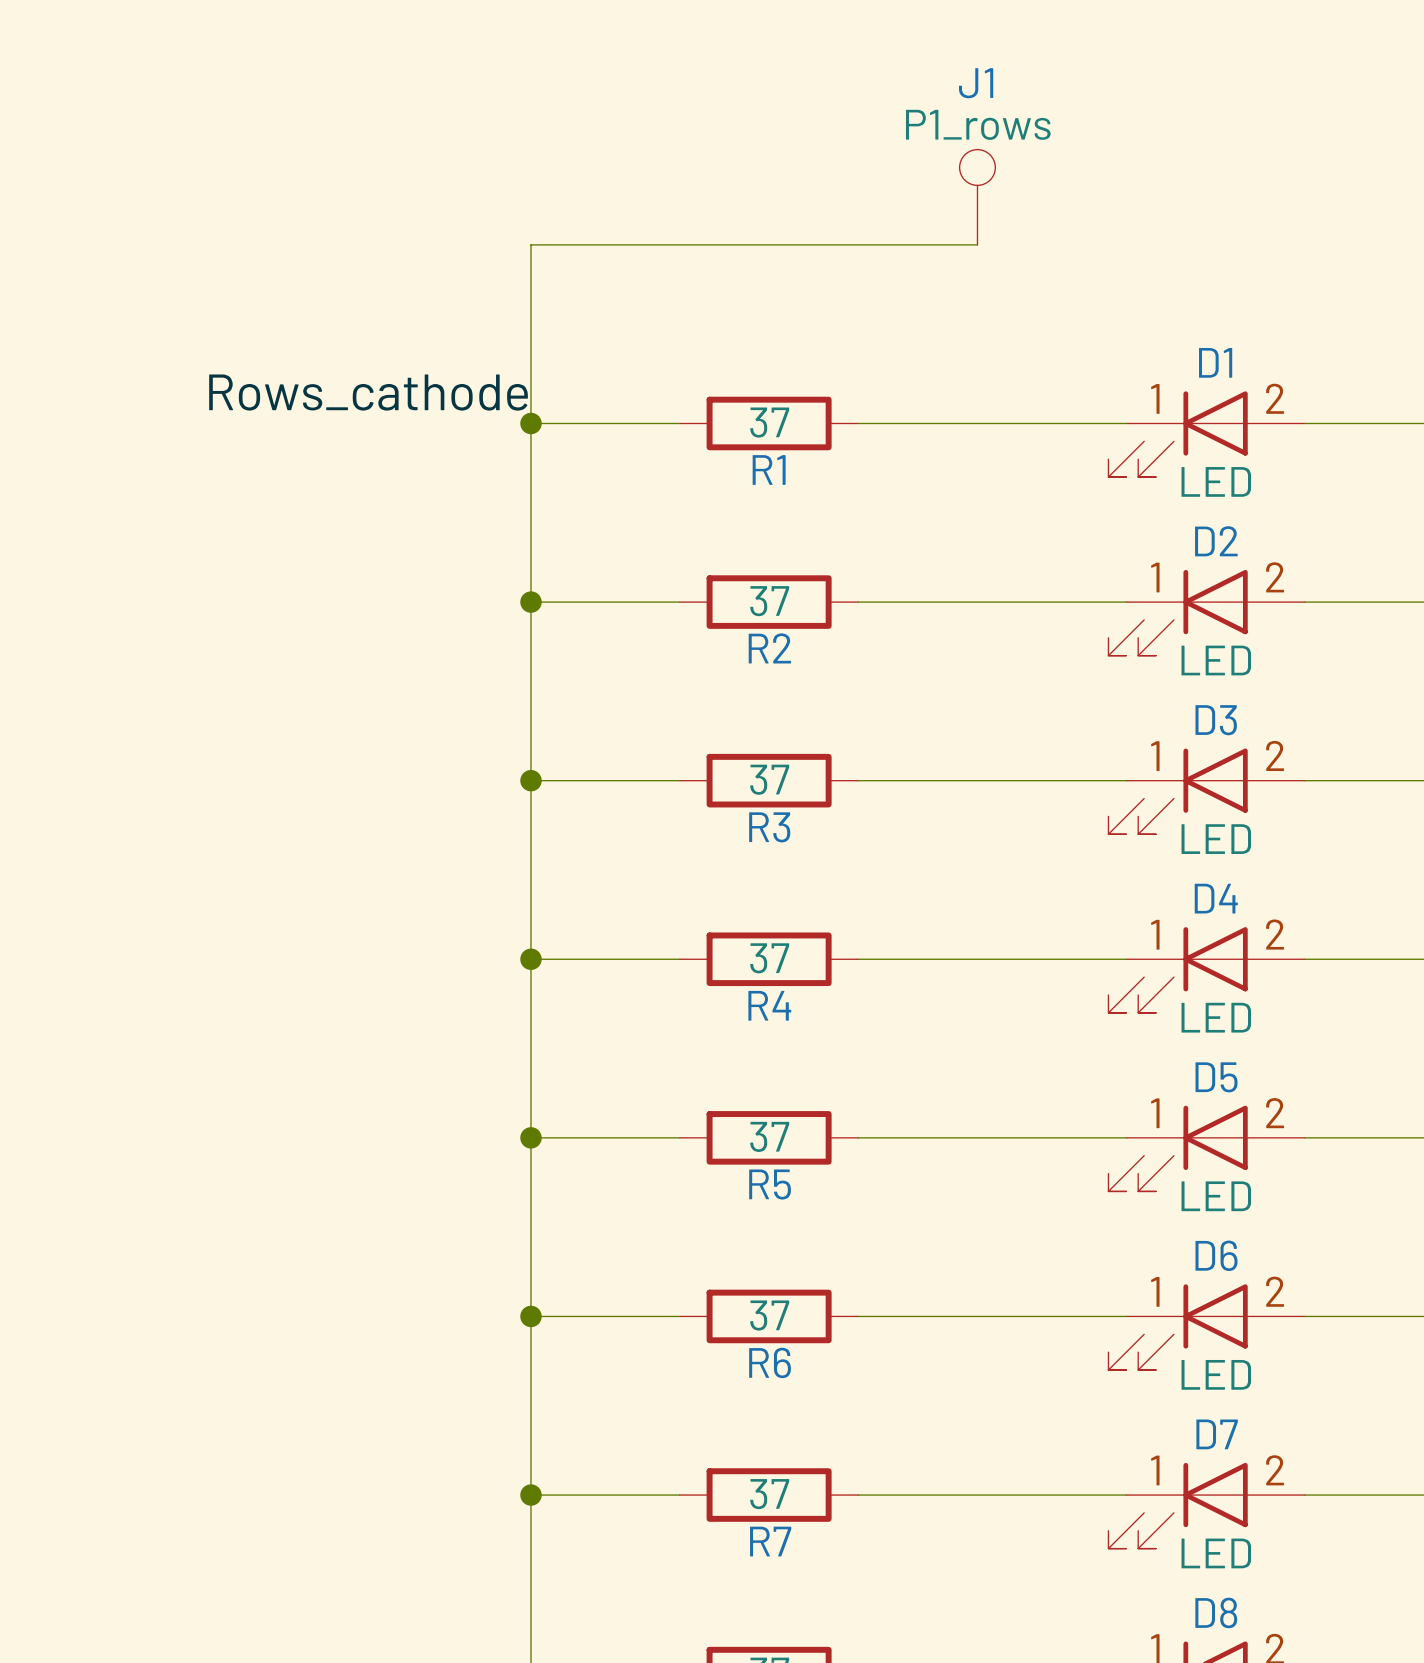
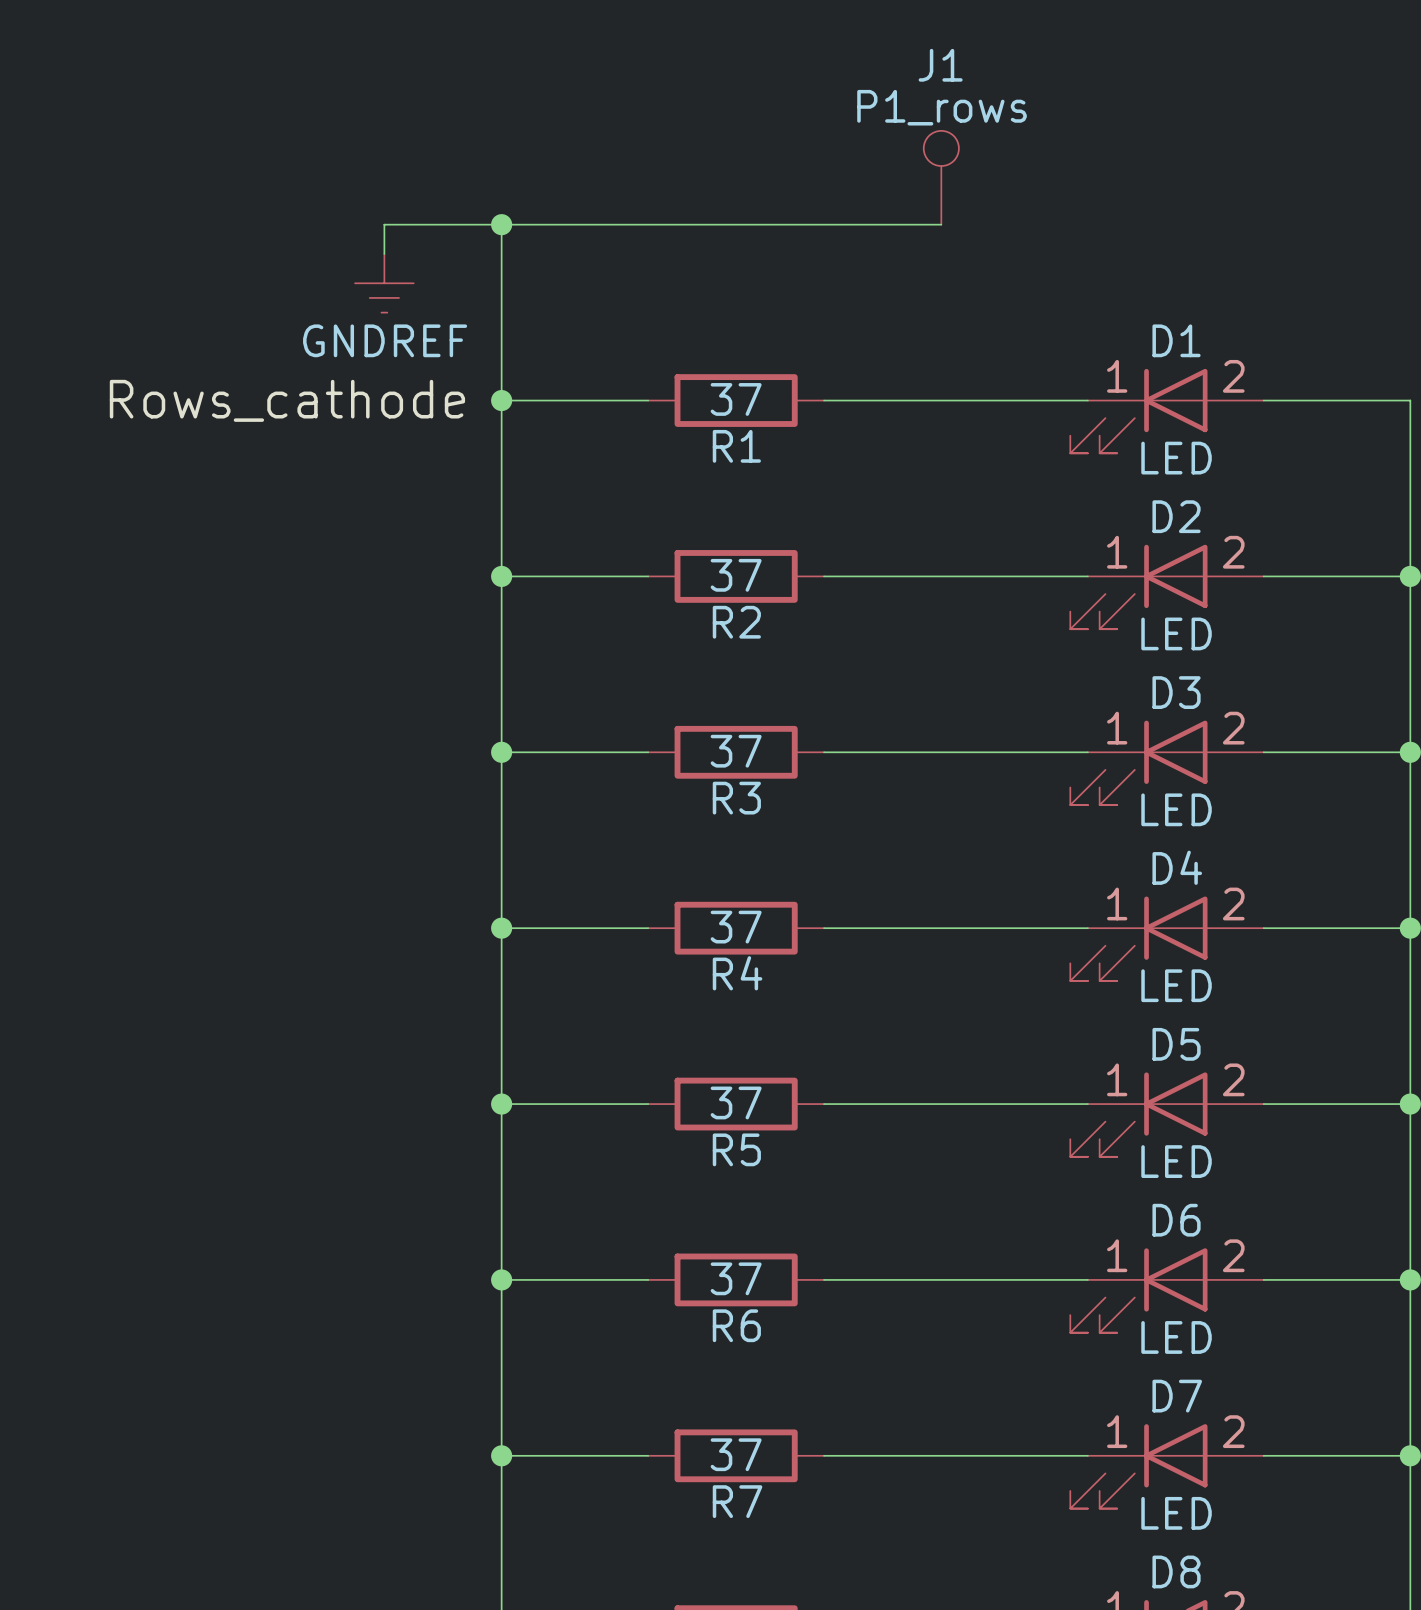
wire: none -> (501, 224) (384, 224) (384, 253)
junction: none -> (501, 224)
power symbol: none -> GNDREF (384, 283)
label position: Rows_cathode (368, 392) -> Rows_cathode (287, 400)

